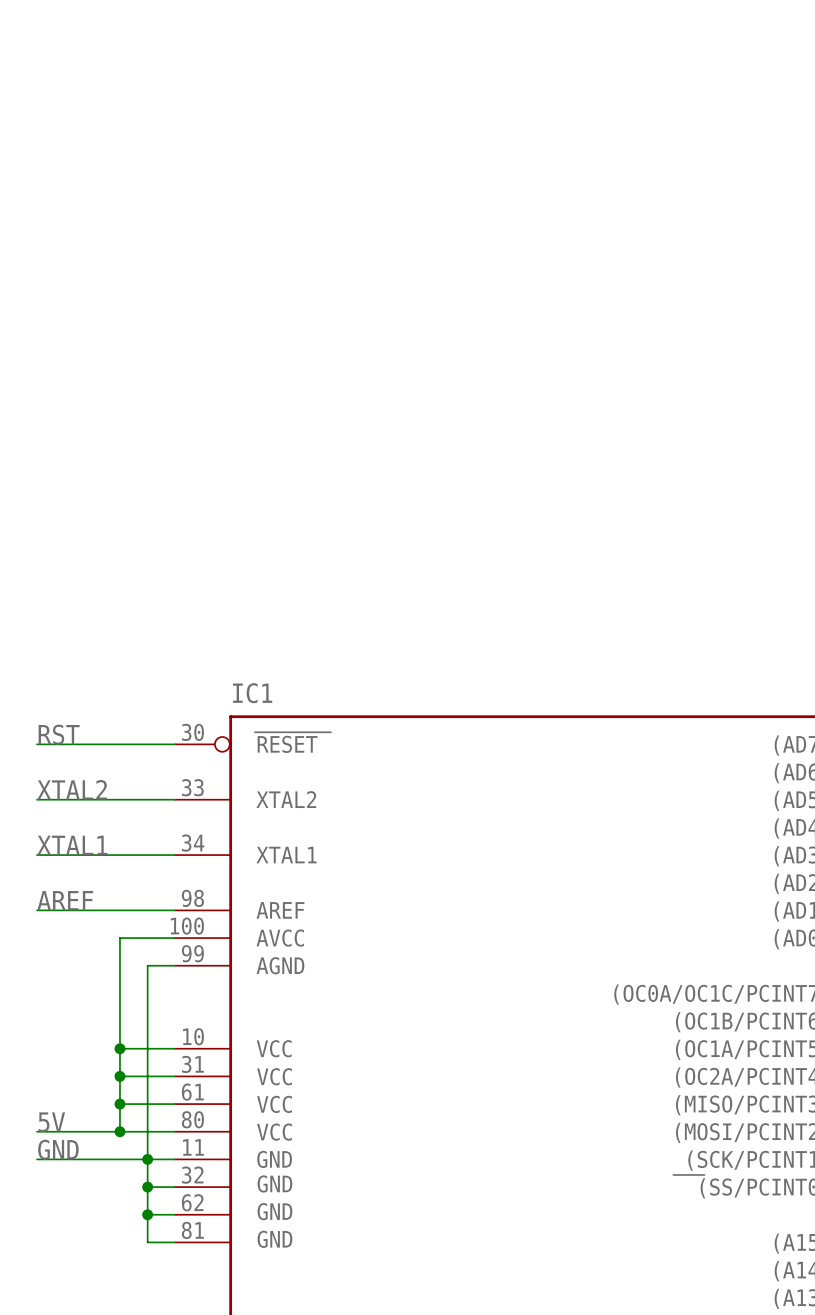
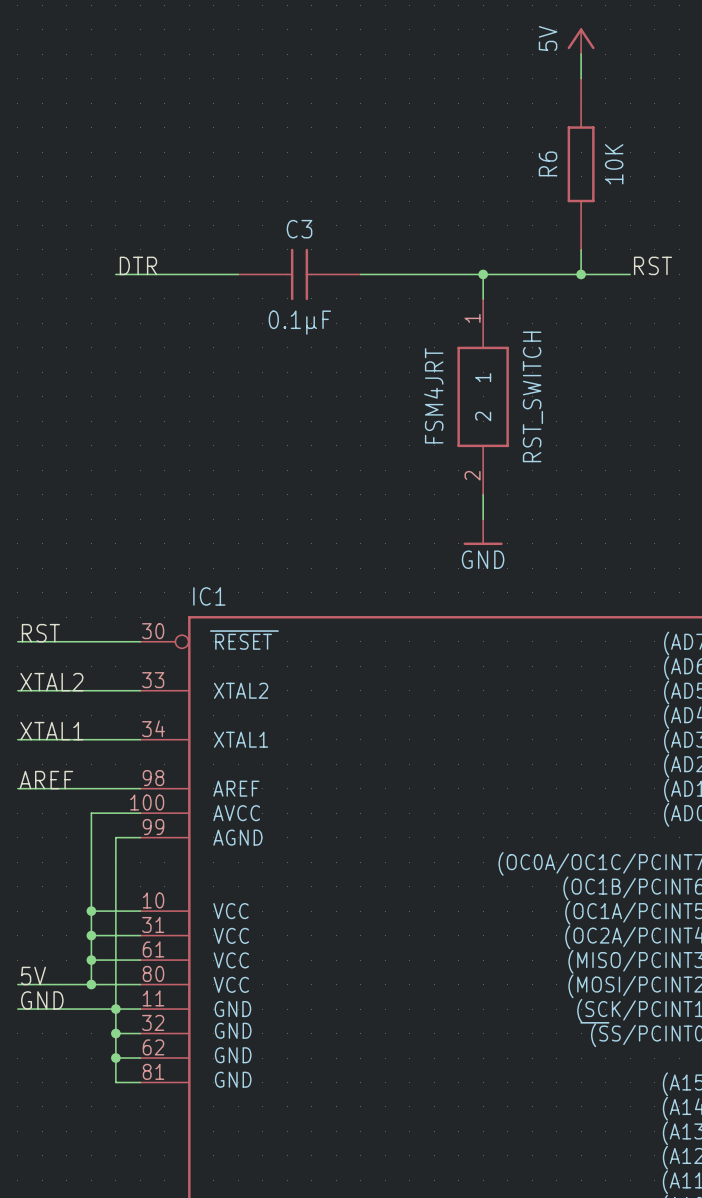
power symbol: none -> 5V (581, 41)
wire: none -> (581, 54) (581, 78)
R6: none -> 10K (581, 164)
wire: none -> (581, 249) (581, 274)
label: none -> DTR (138, 265)
label: none -> RST (653, 265)
wire: none -> (115, 274) (238, 274)
C3: none -> 0.1µF (299, 274)
wire: none -> (360, 274) (630, 274)
wire: none -> (483, 274) (483, 298)
junction: none -> (483, 274)
junction: none -> (581, 274)
RST_SWITCH: none -> FSM4JRT (483, 396)
wire: none -> (483, 494) (483, 519)
power symbol: none -> GND (483, 532)

